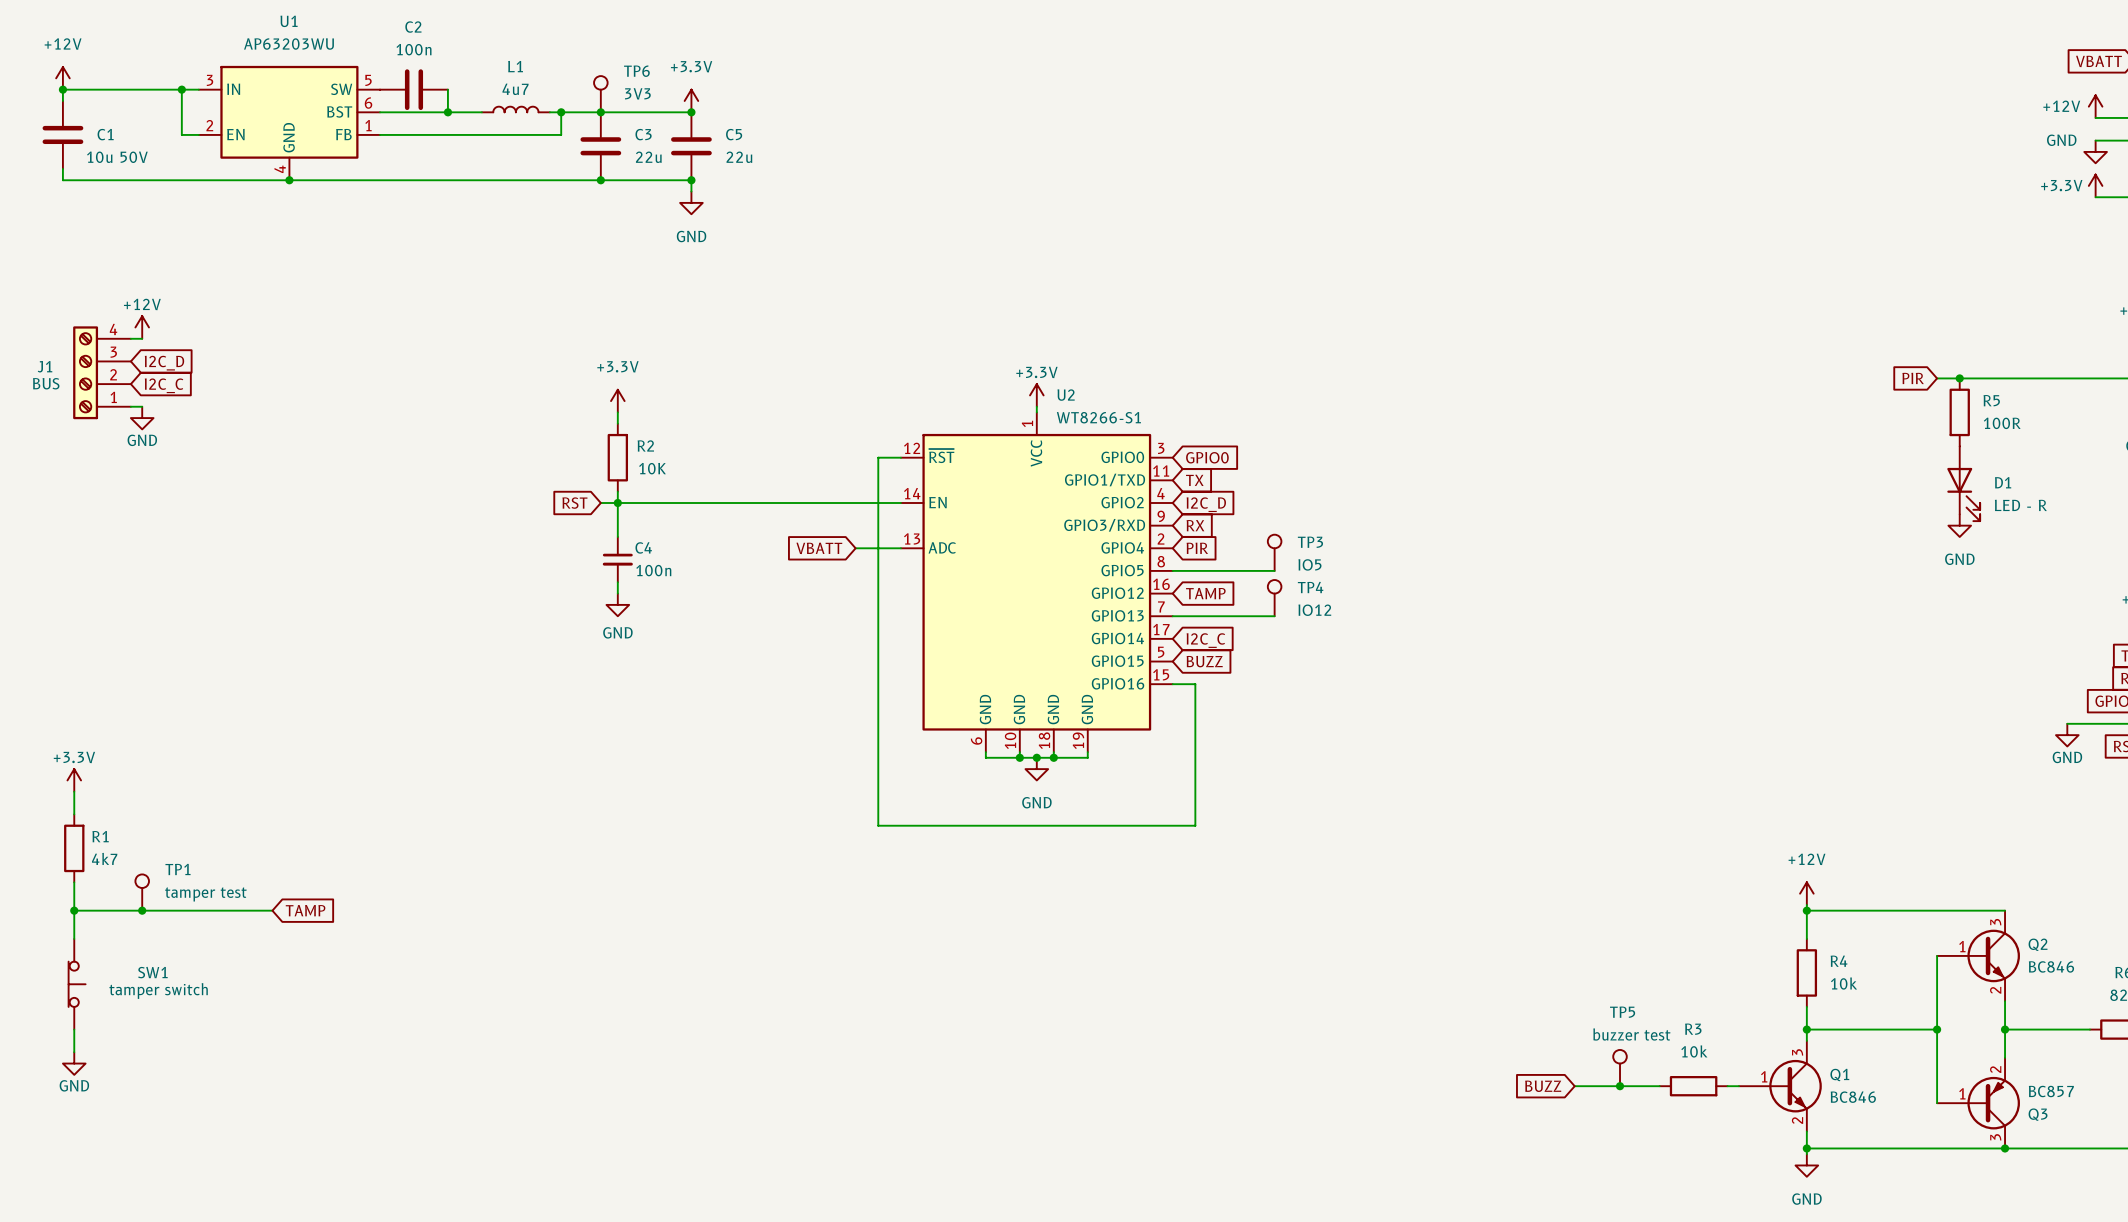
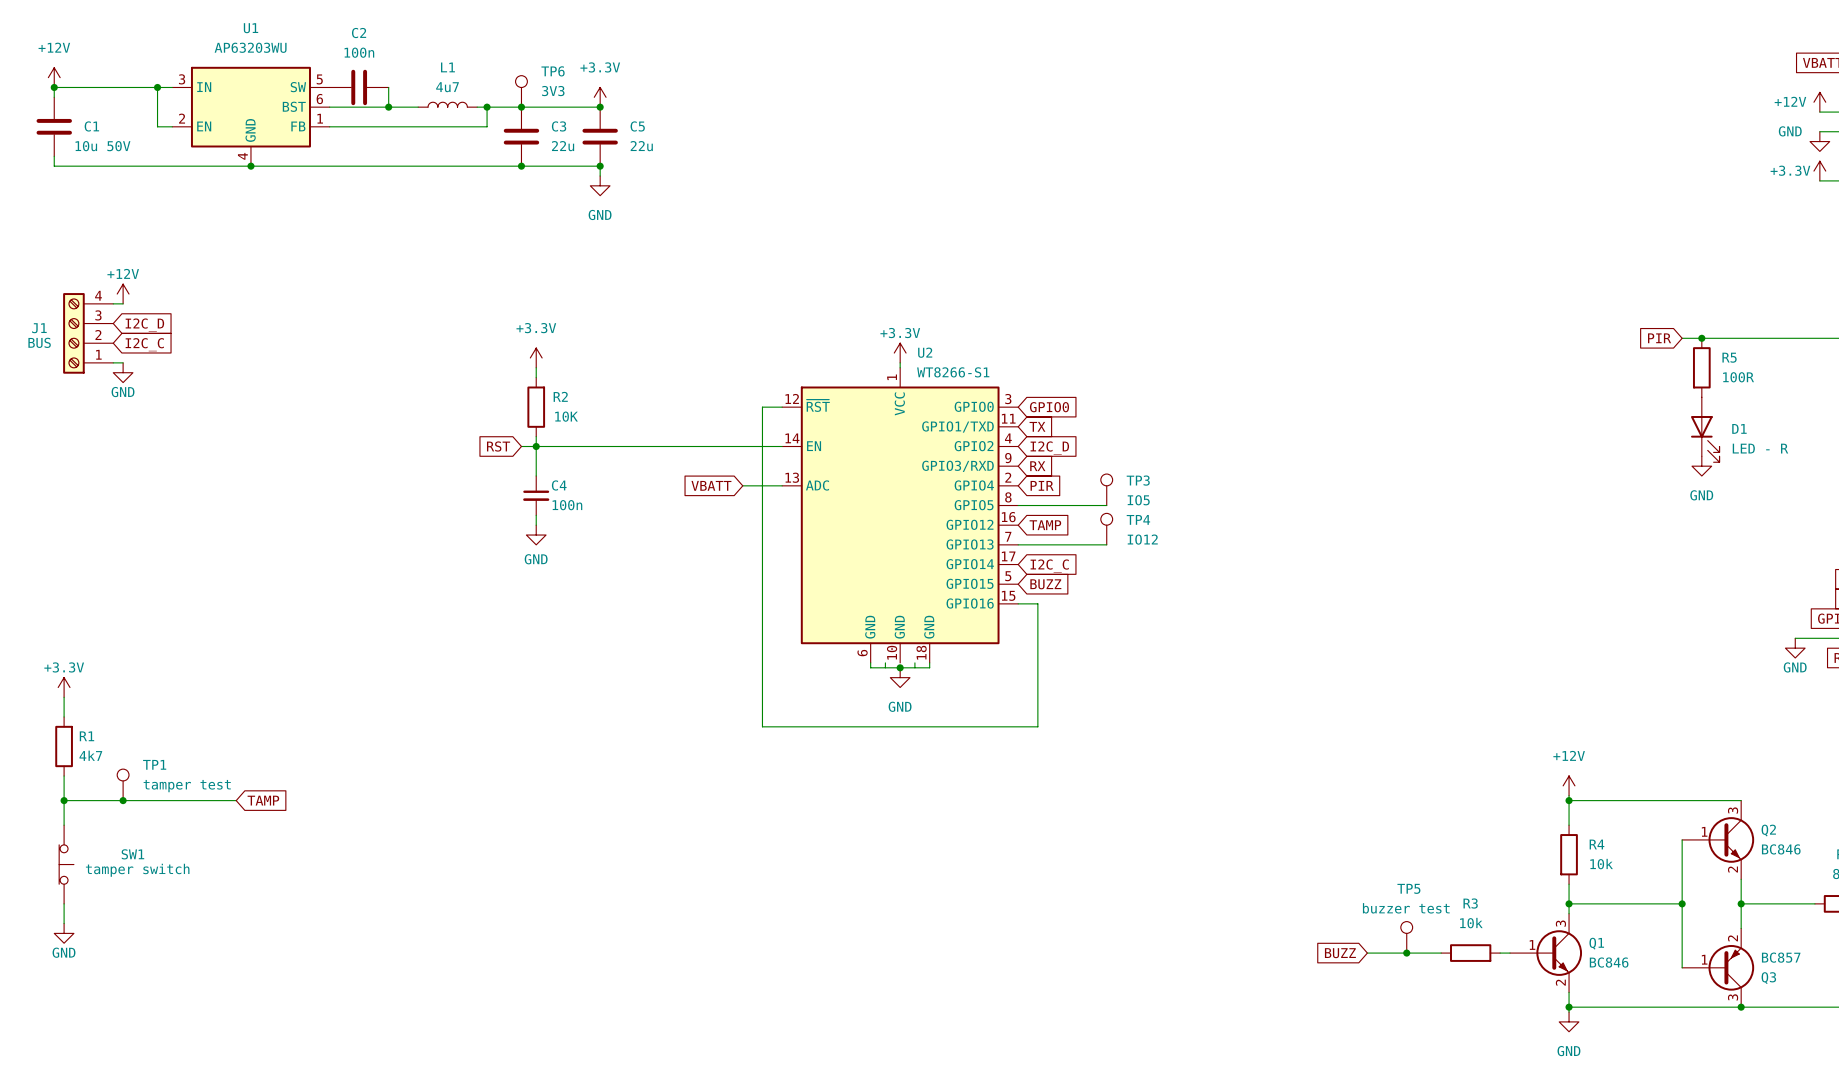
U2 symbol: [900, 412, 1173, 753] -> [782, 367, 1019, 663]
wire: (985, 752) (985, 757) (1002, 757) -> (870, 662) (870, 667)
wire: (1087, 752) (1087, 757) (1070, 757) -> (929, 662) (929, 667)
junction: (1019, 757) -> none
junction: (1053, 757) -> none

